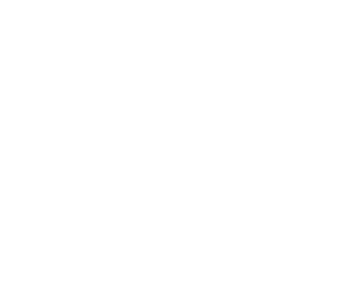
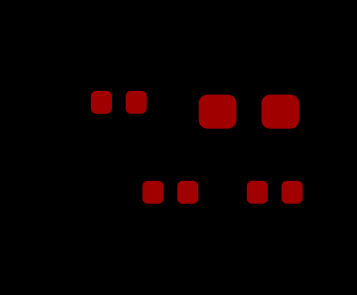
part: none -> (118, 102)
part: none -> (248, 111)
part: none -> (170, 192)
part: none -> (274, 192)

